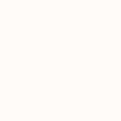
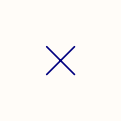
no-connect mark: none -> (60, 60)

